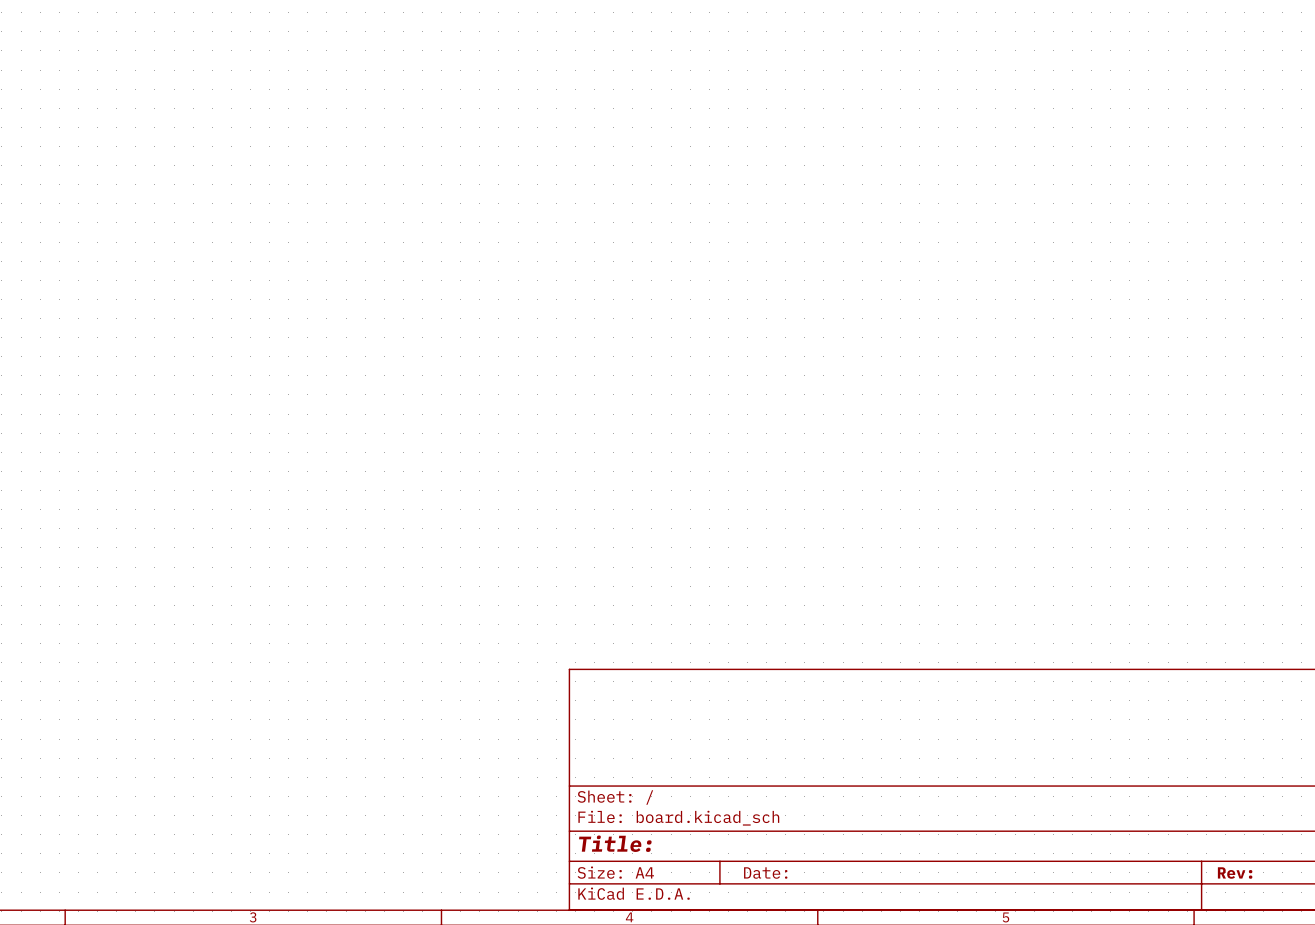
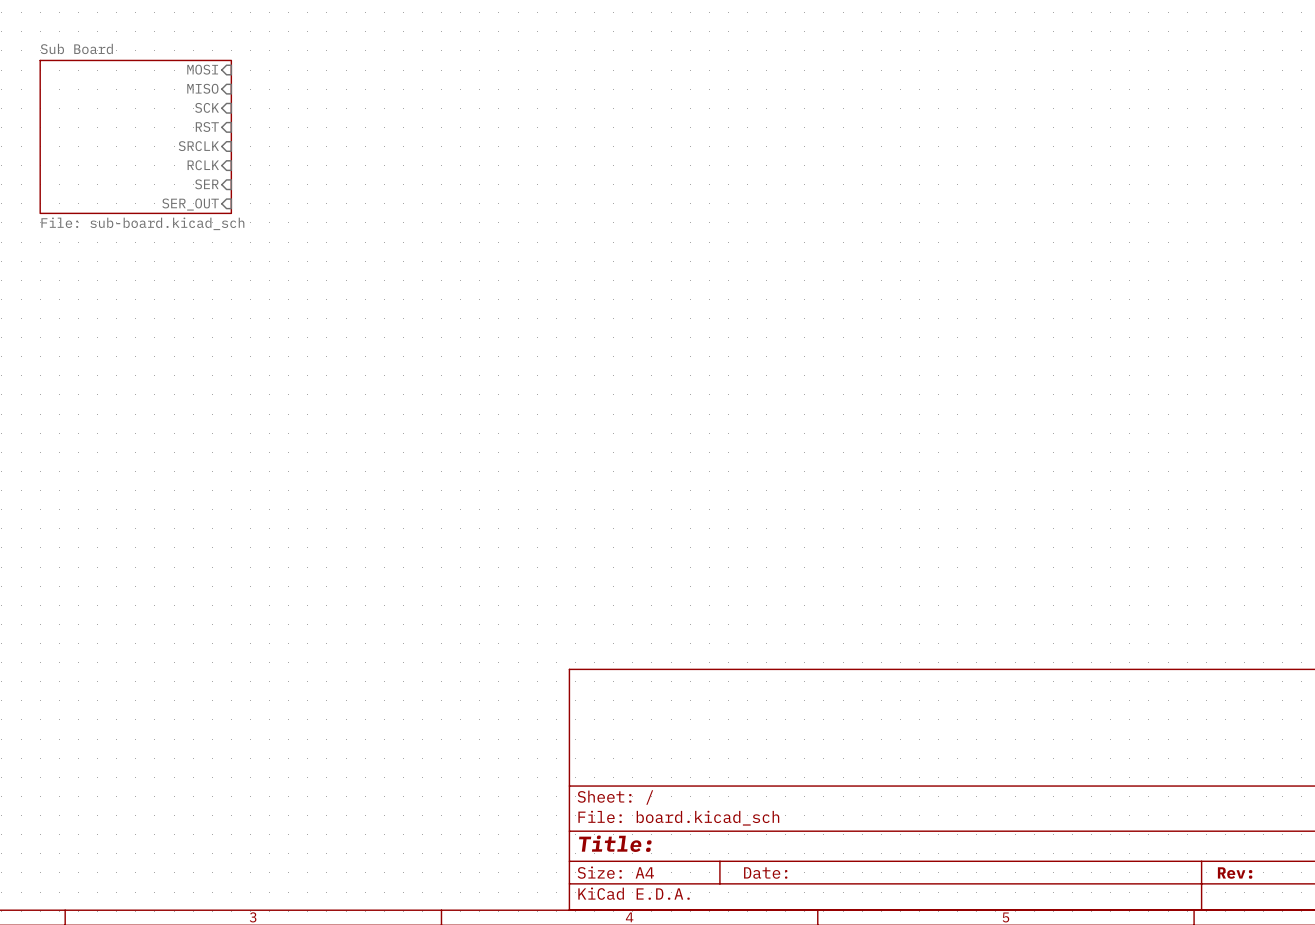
sheet pin: none -> MOSI (202, 69)
sheet pin: none -> MISO (202, 88)
sheet pin: none -> SCK (207, 107)
sheet pin: none -> RST (207, 127)
sheet Sub Board: none -> File: sub-board.kicad_sch (135, 136)
sheet pin: none -> SRCLK (198, 146)
sheet pin: none -> RCLK (203, 165)
sheet pin: none -> SER (206, 184)
sheet pin: none -> SER_OUT (190, 204)

